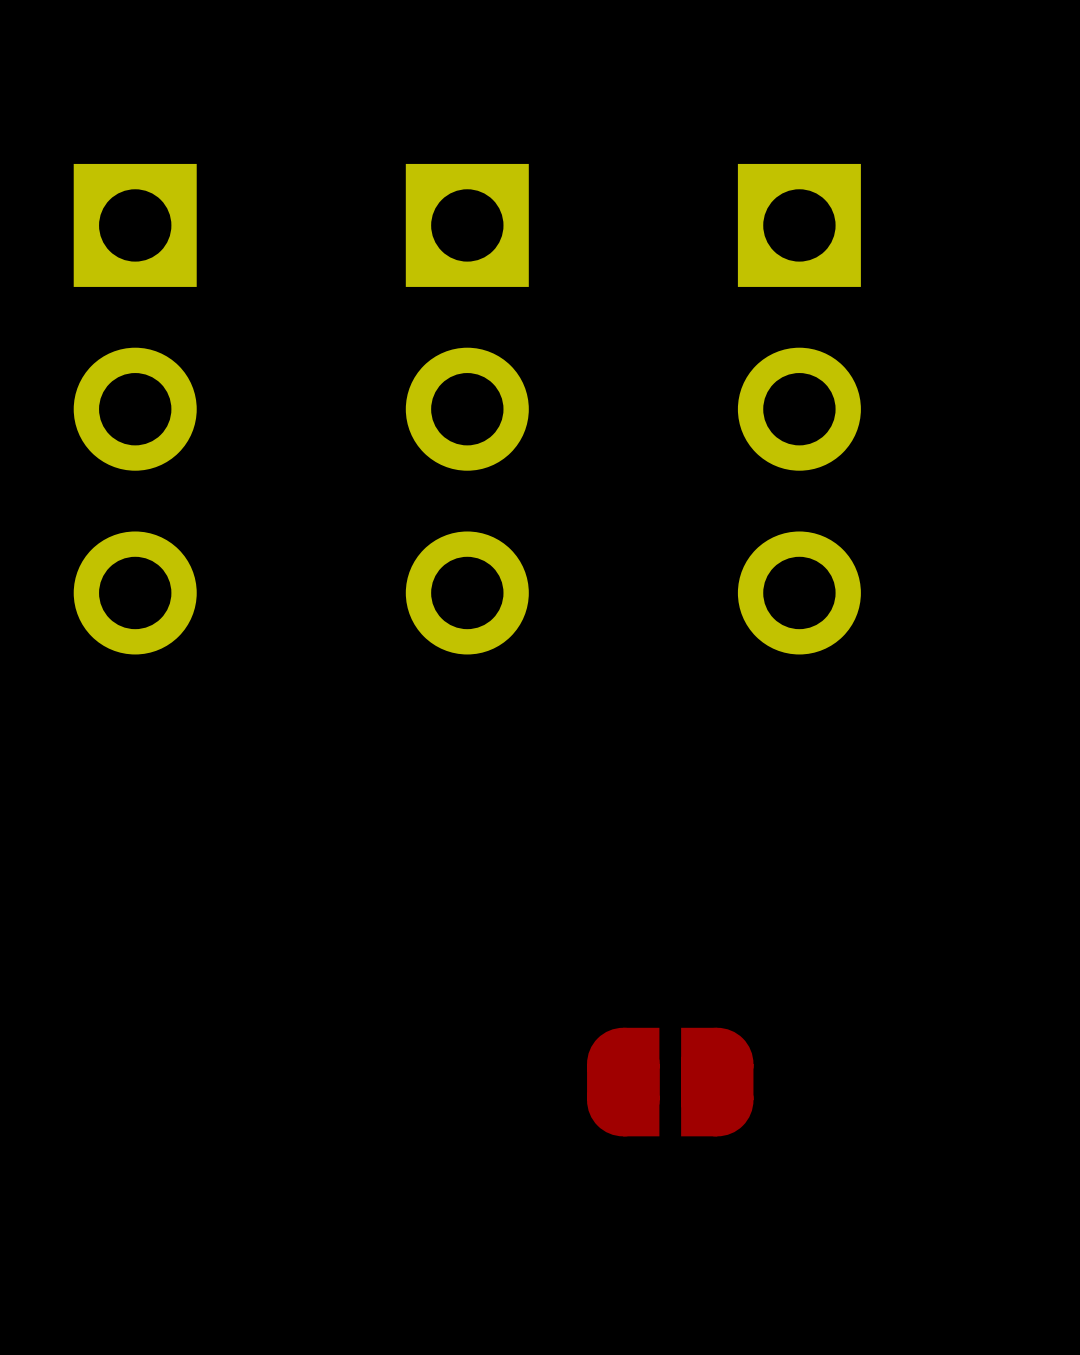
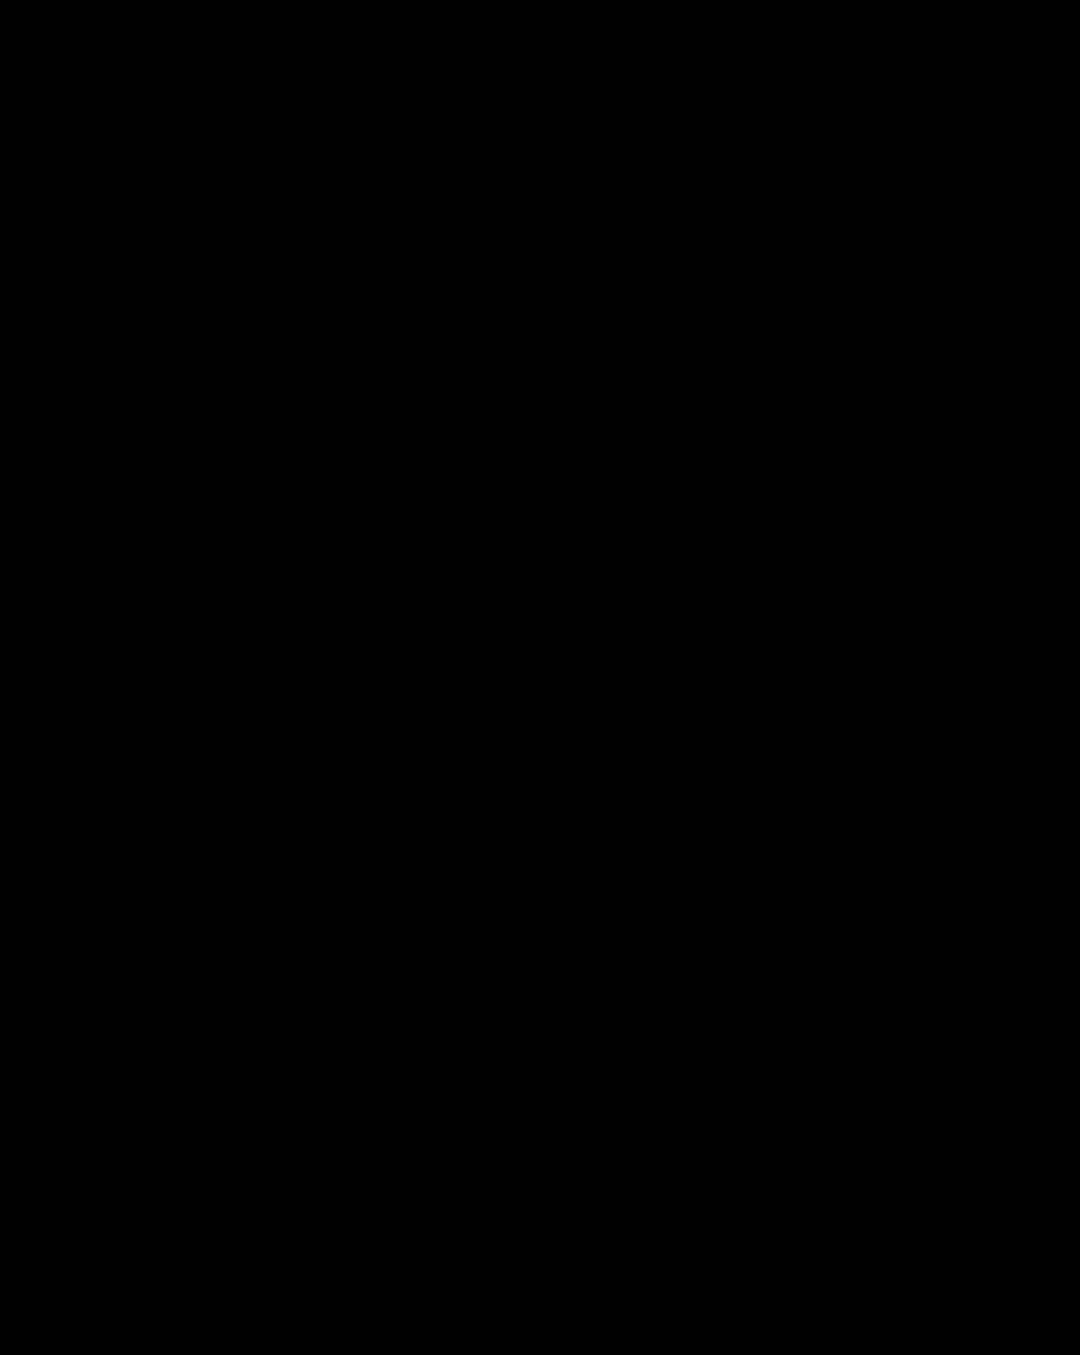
part: (135, 409) -> none
part: (467, 409) -> none
part: (799, 409) -> none
part: (670, 1082) -> none

